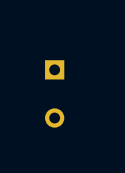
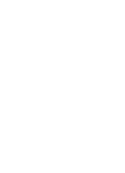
part: (54, 93) -> none

